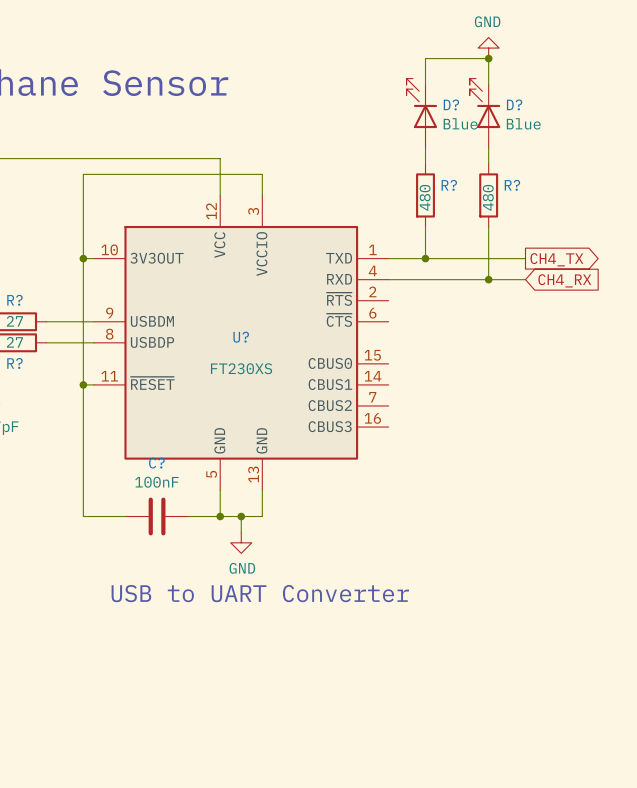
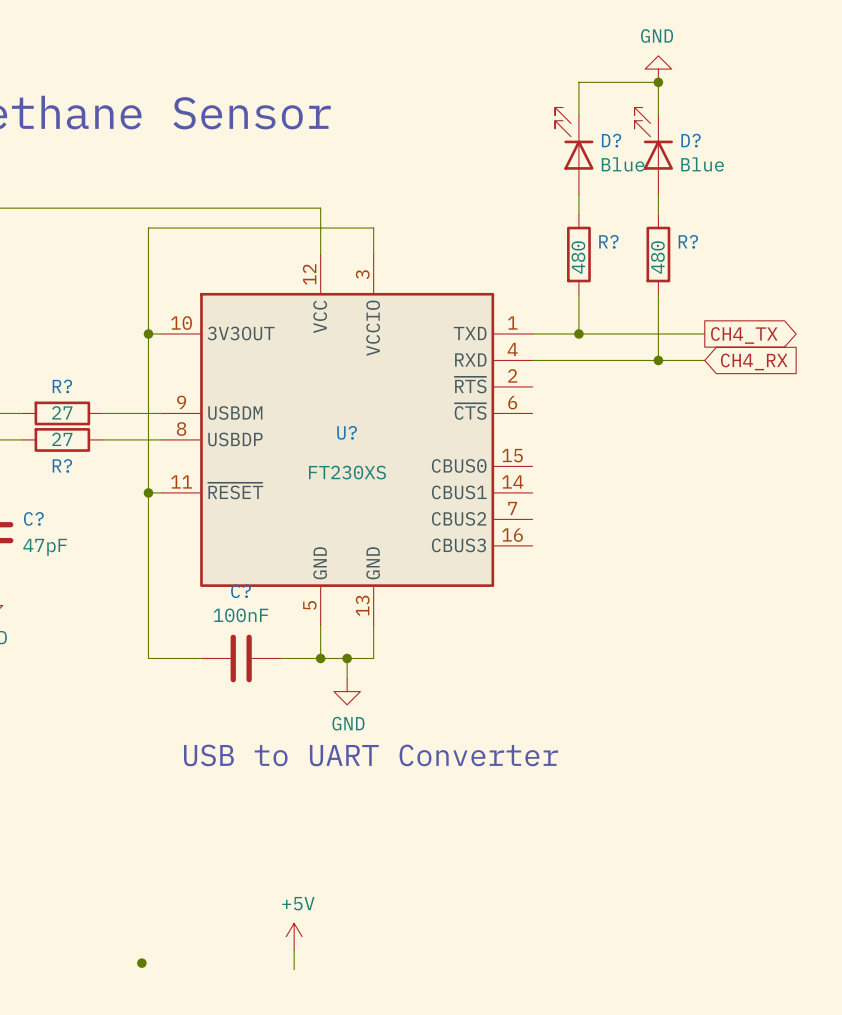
power symbol: none -> +5V (294, 936)
wire: none -> (294, 949) (294, 969)
junction: none -> (141, 963)

